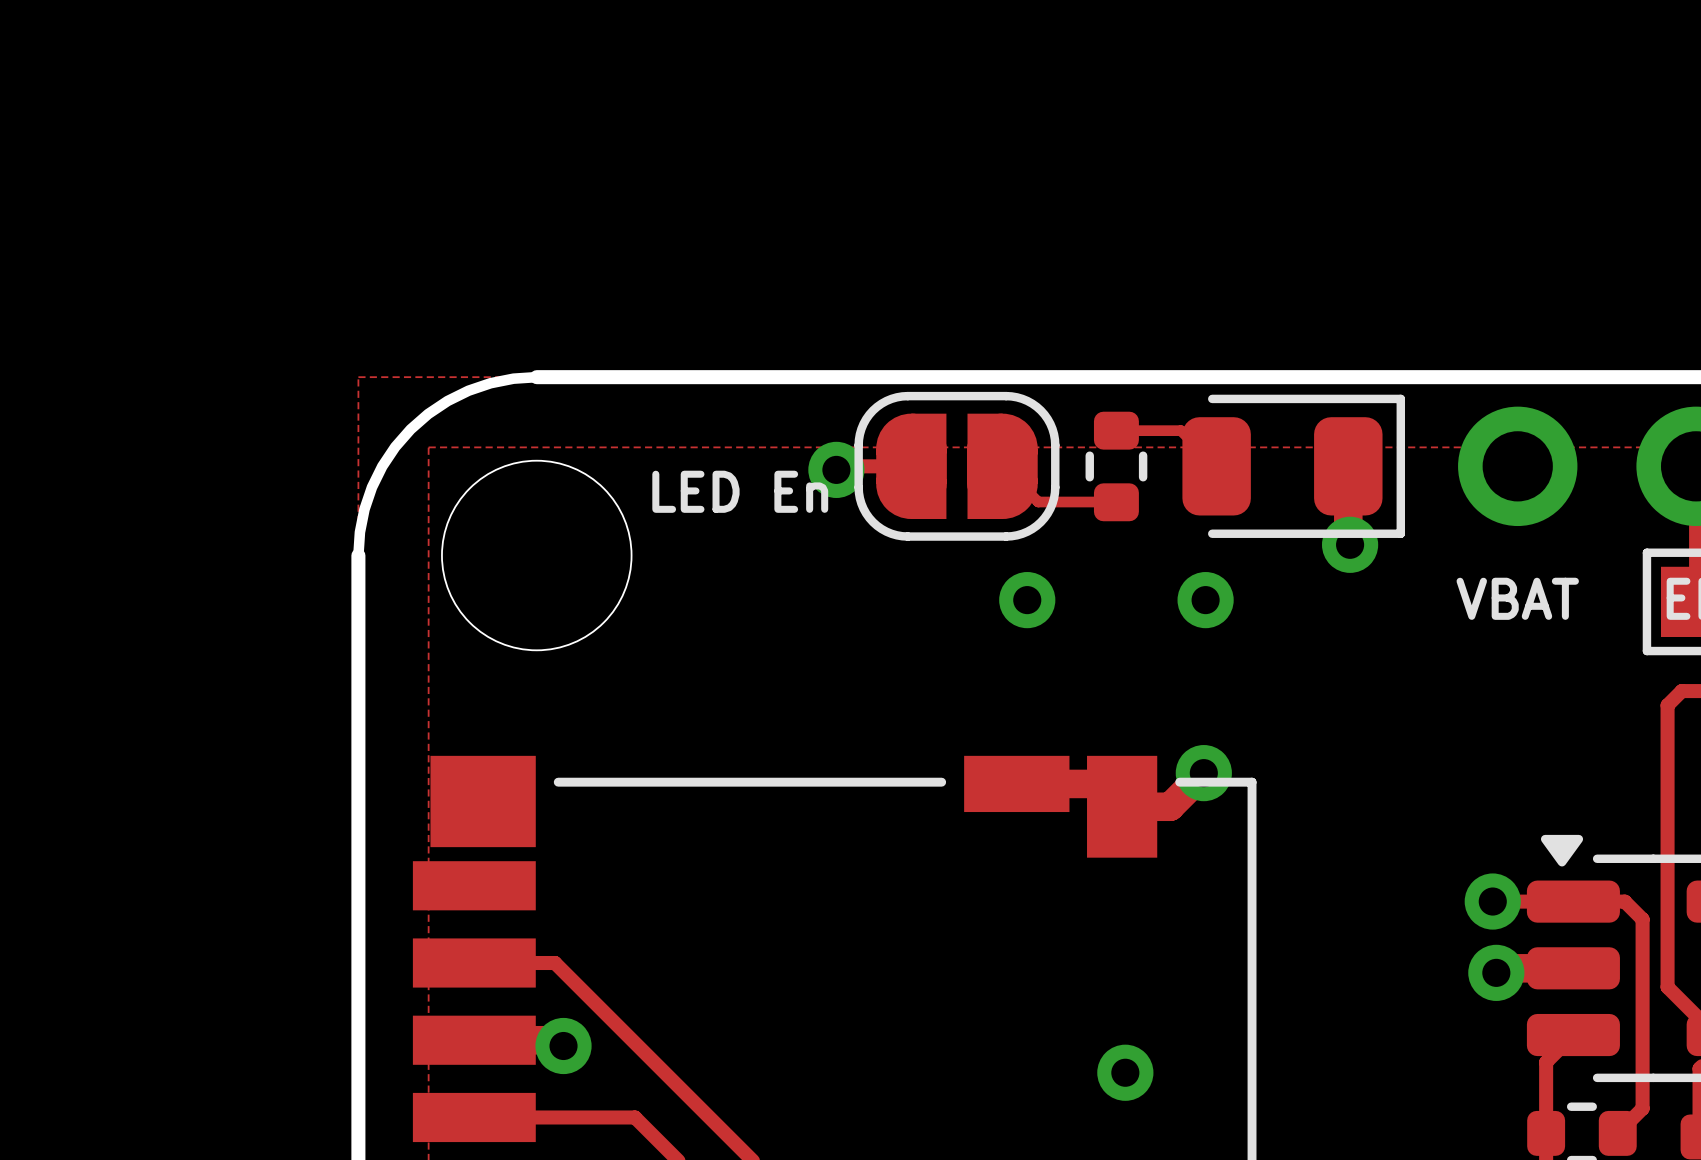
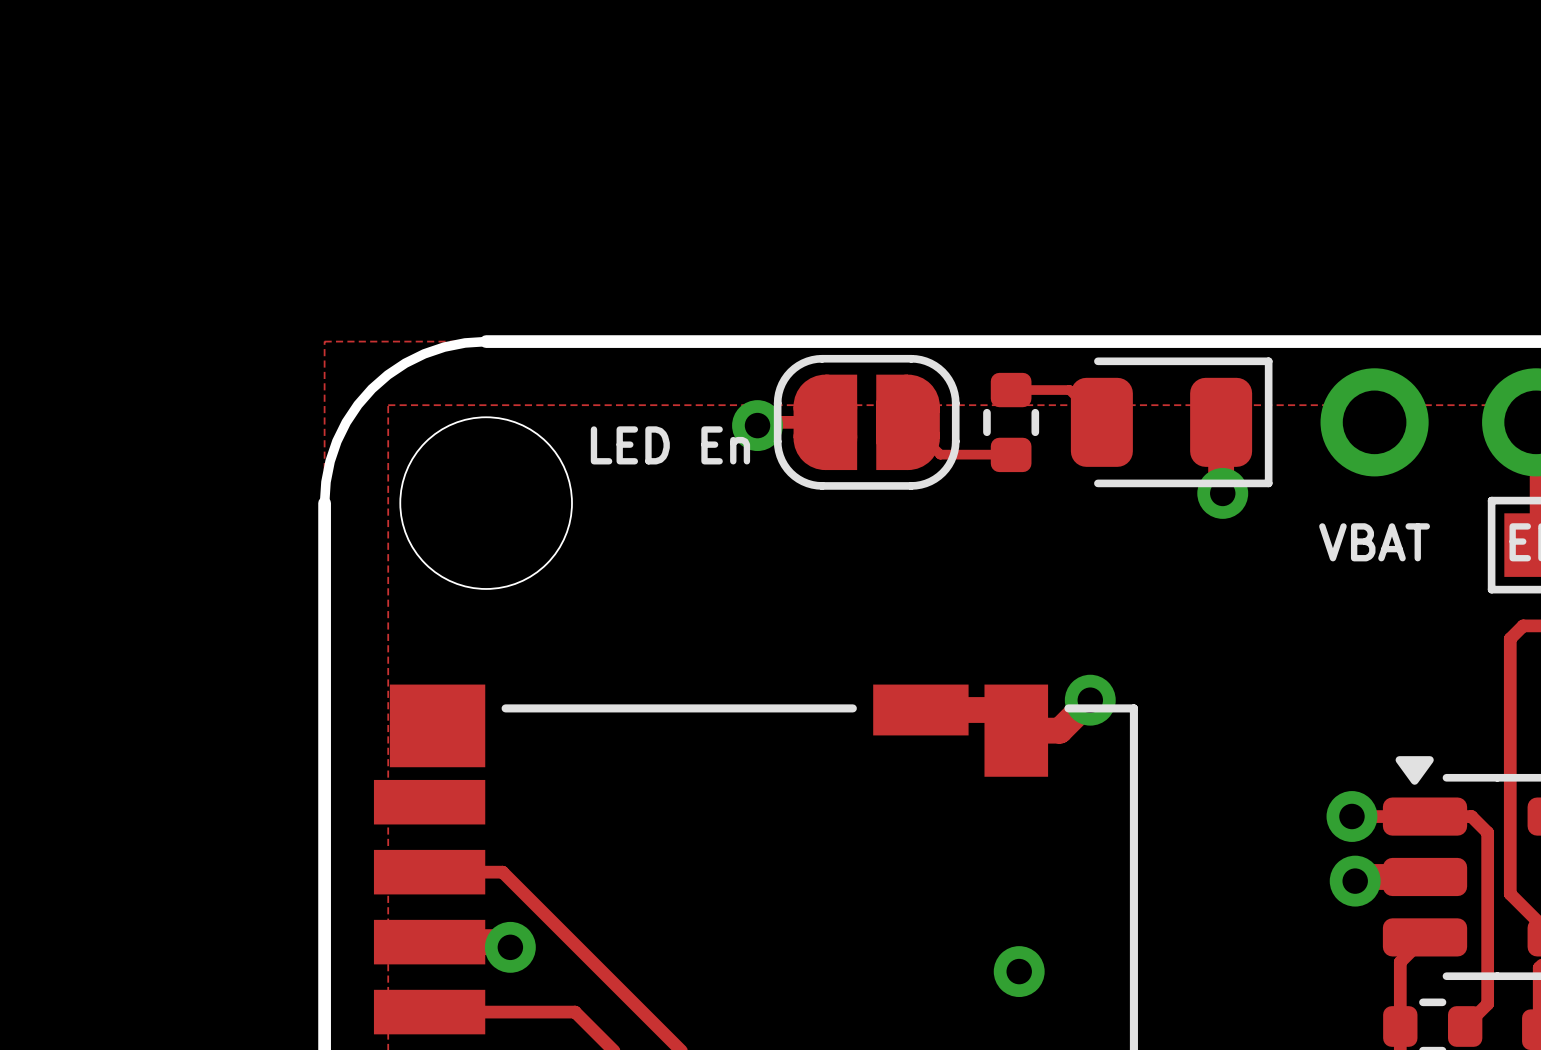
via: (1027, 600) -> none
via: (1205, 600) -> none

